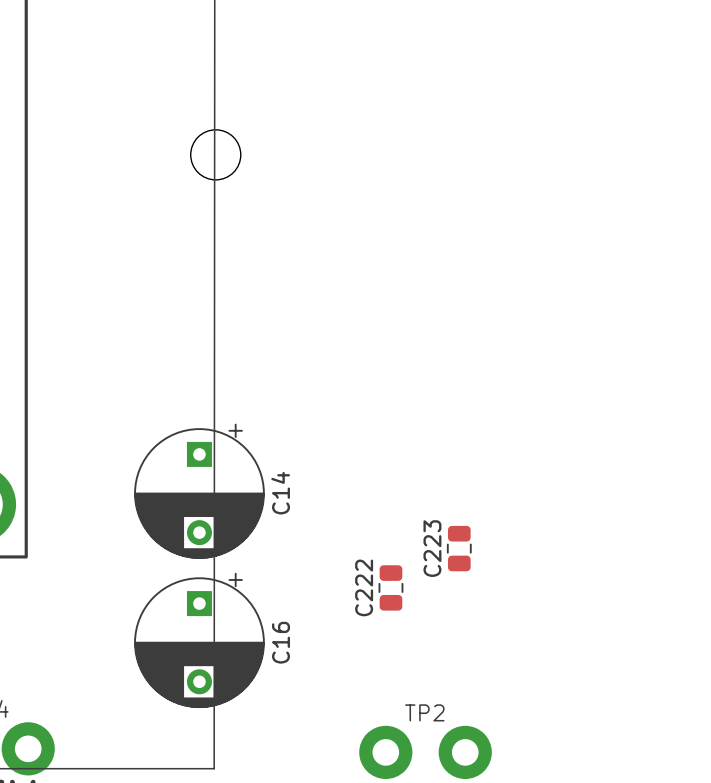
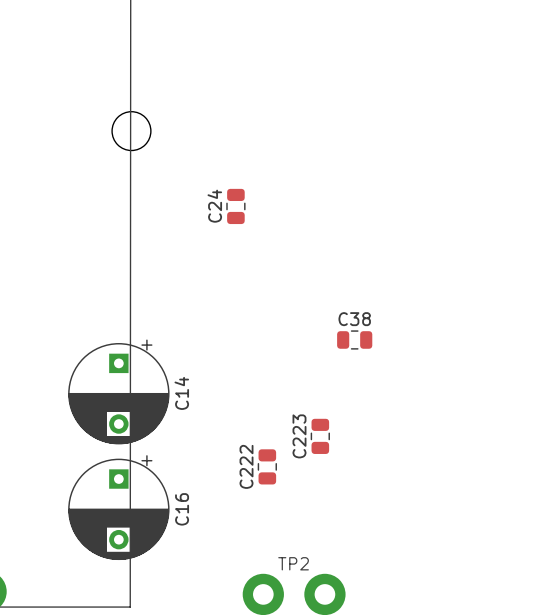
C24: none -> (235, 206)
C38: none -> (354, 339)

